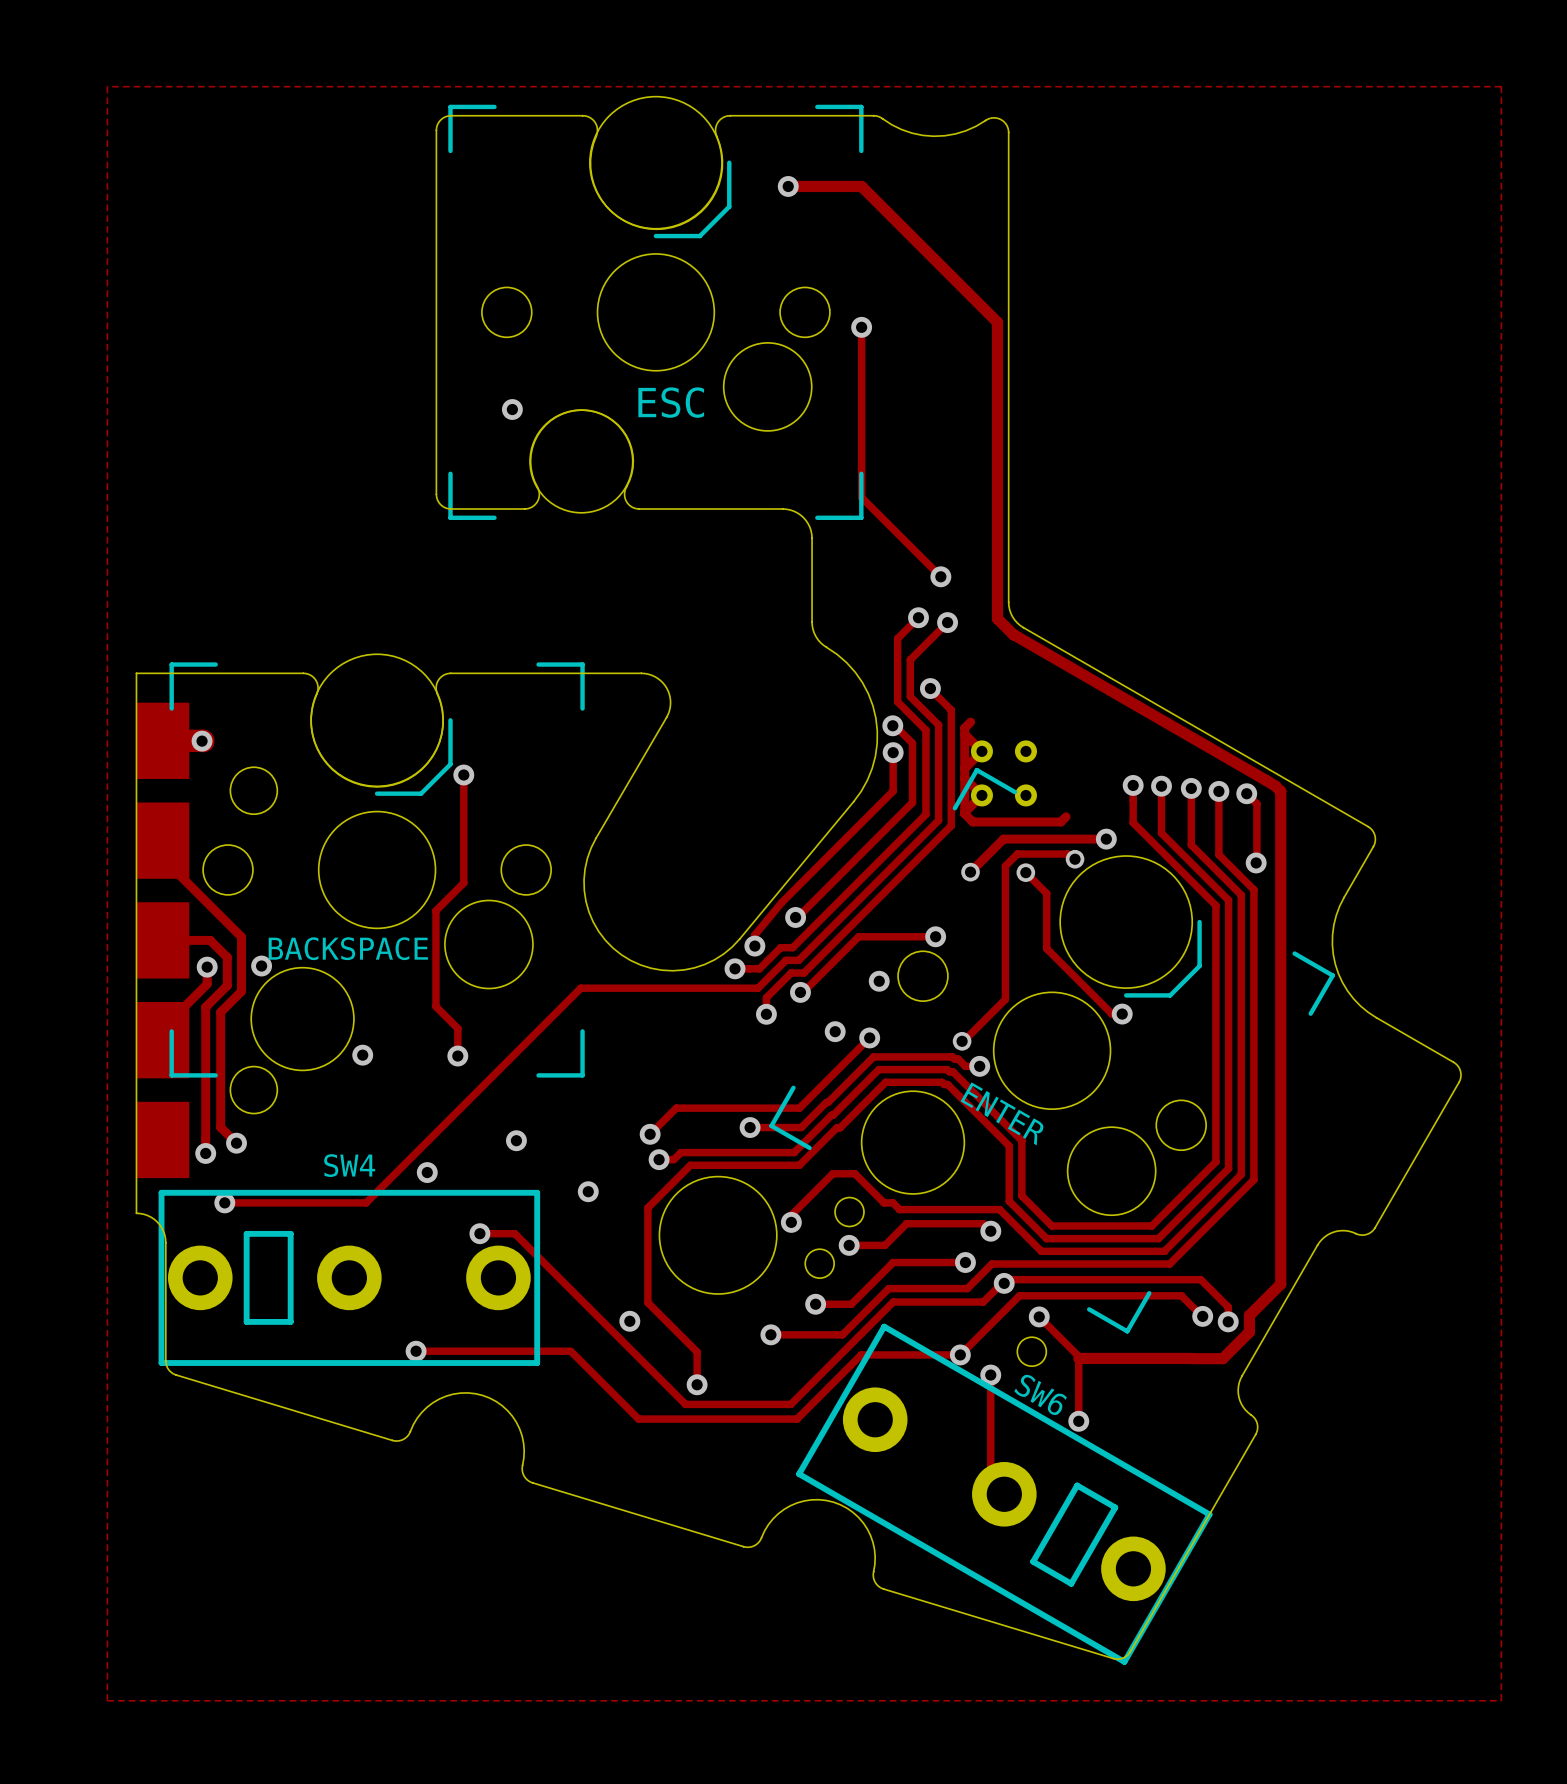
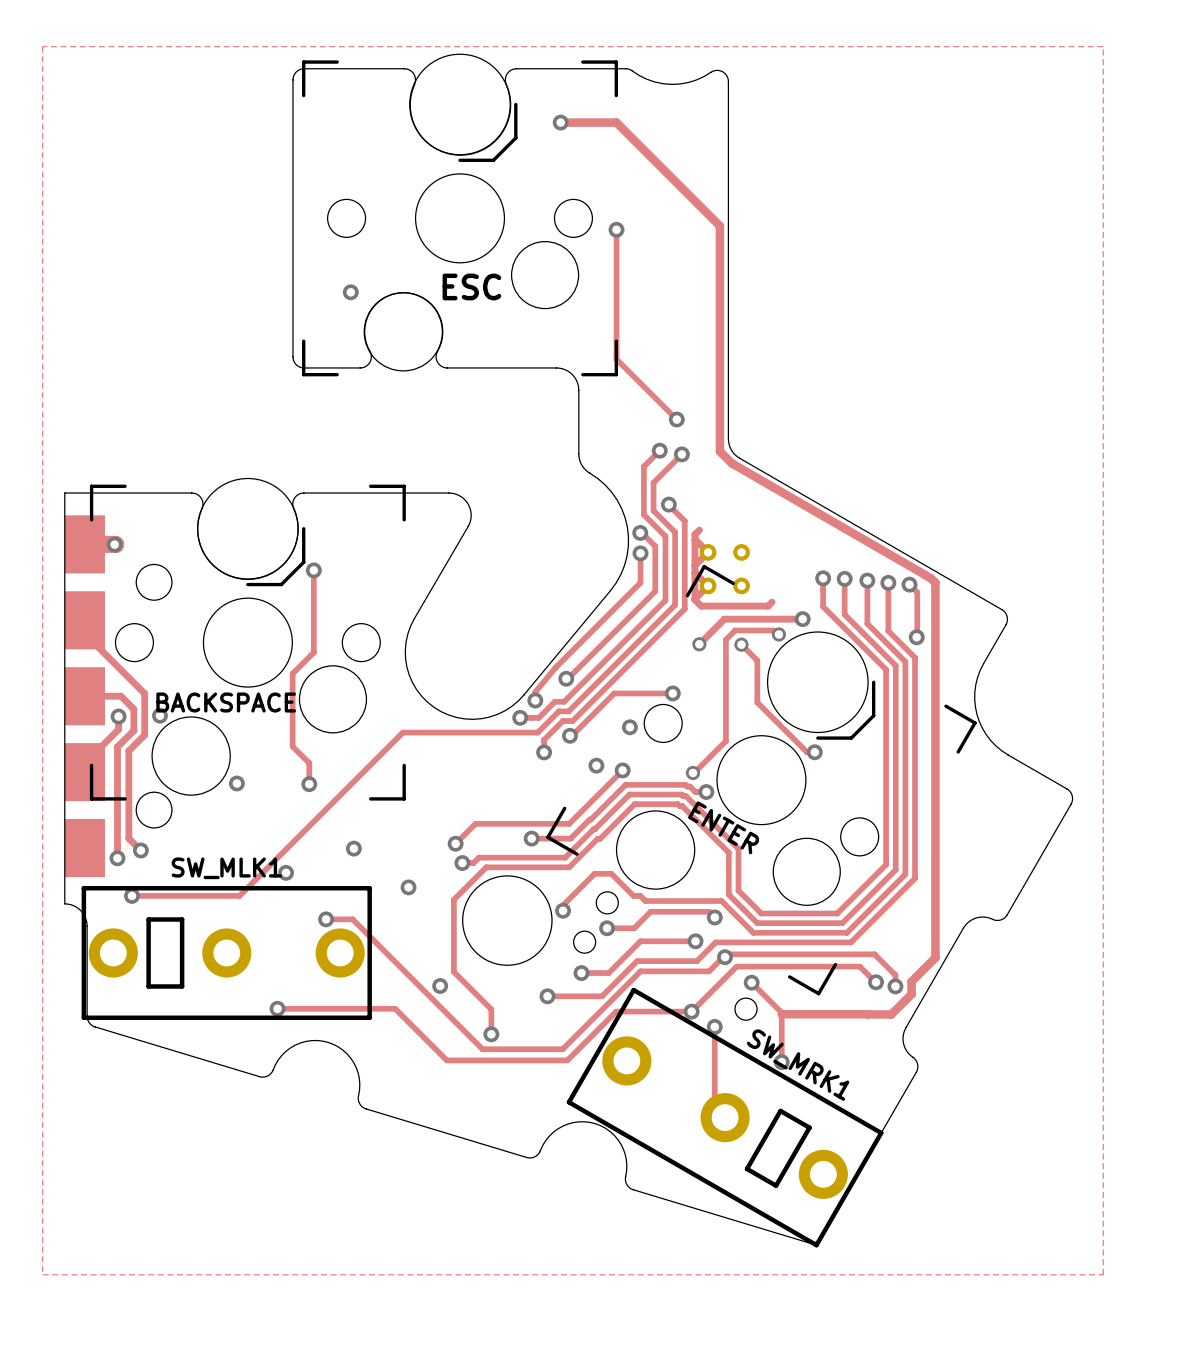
SW4 name: SW4 (349, 1165) -> SW_MLK1 (226, 868)
SW6 name: SW6 (1040, 1395) -> SW_MRK1 (798, 1065)

